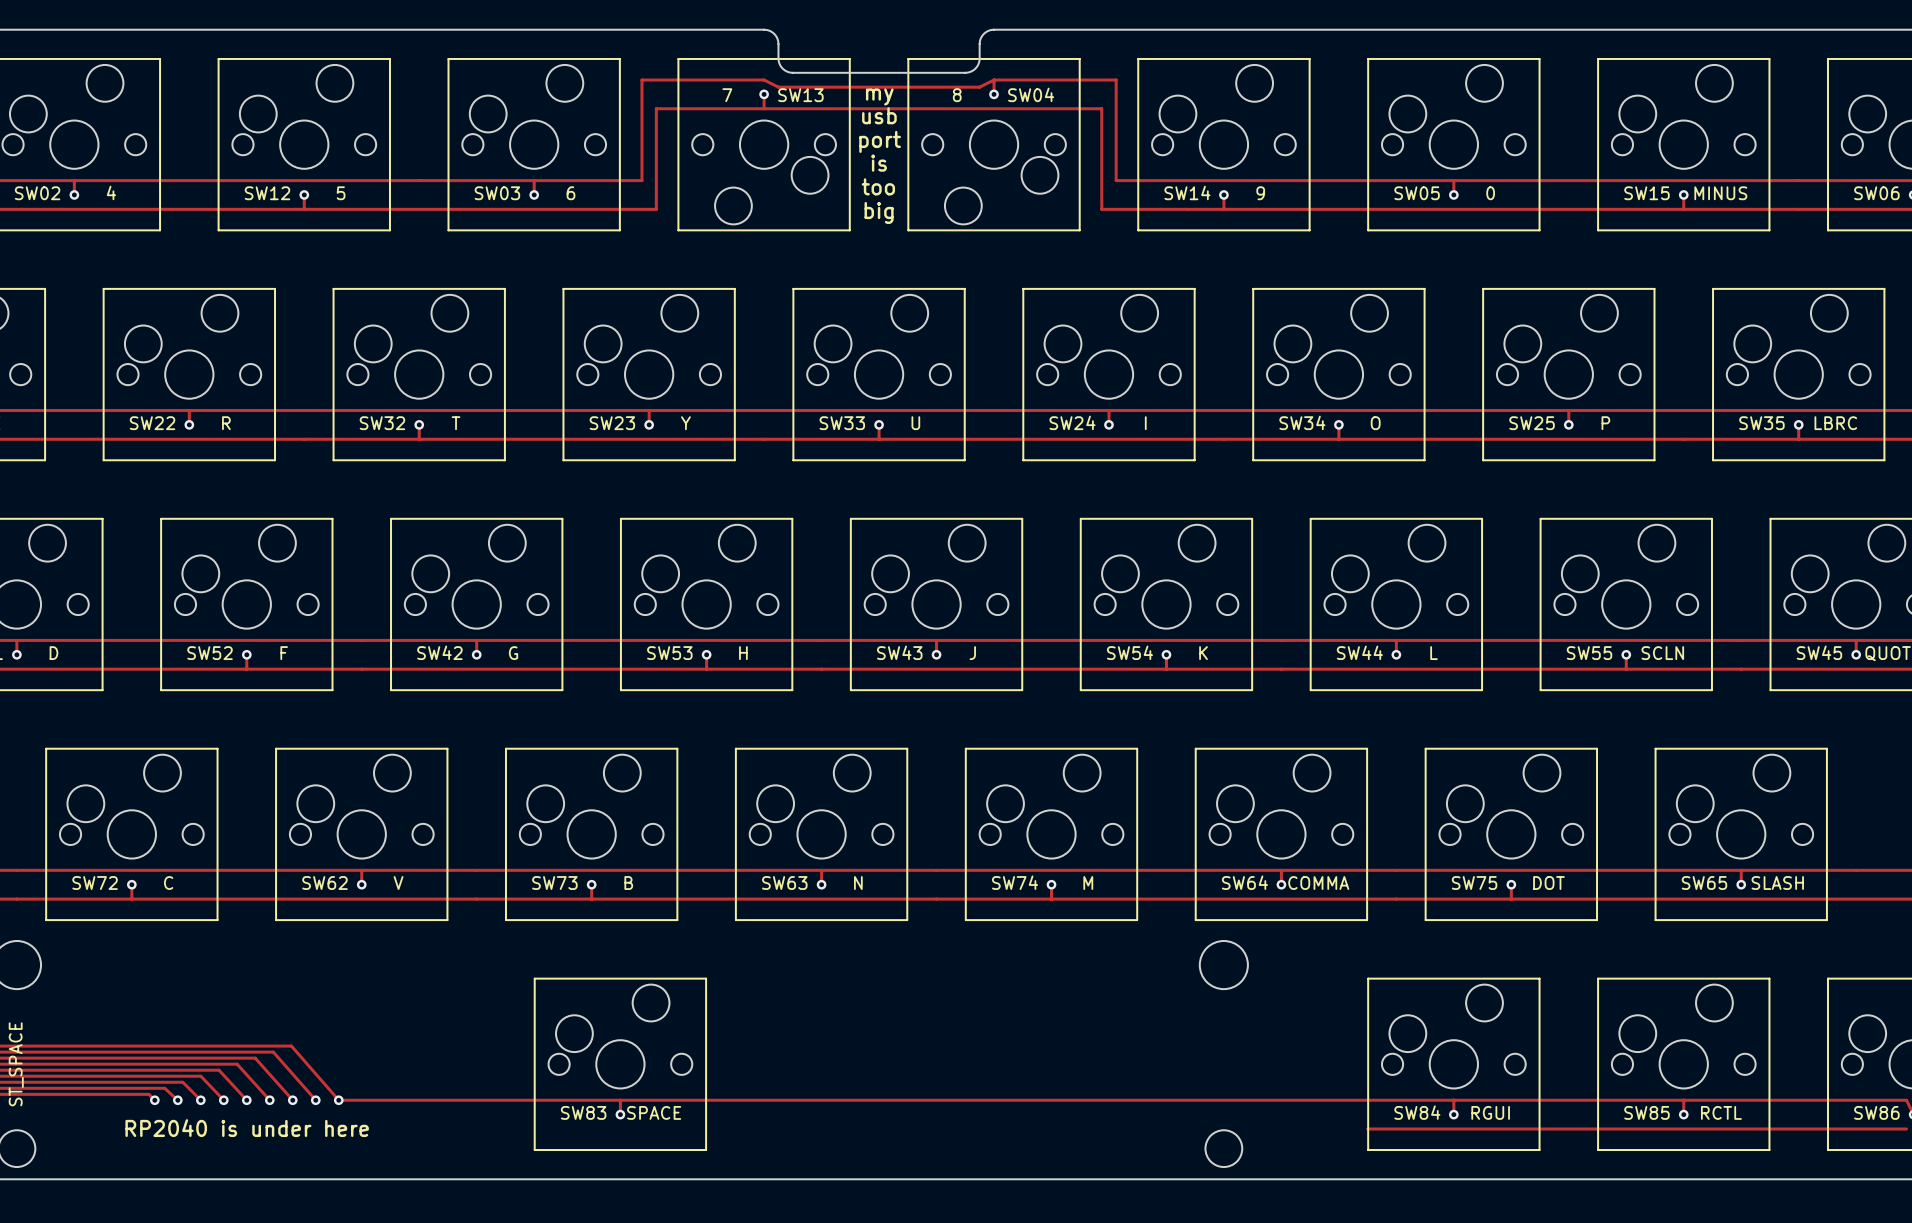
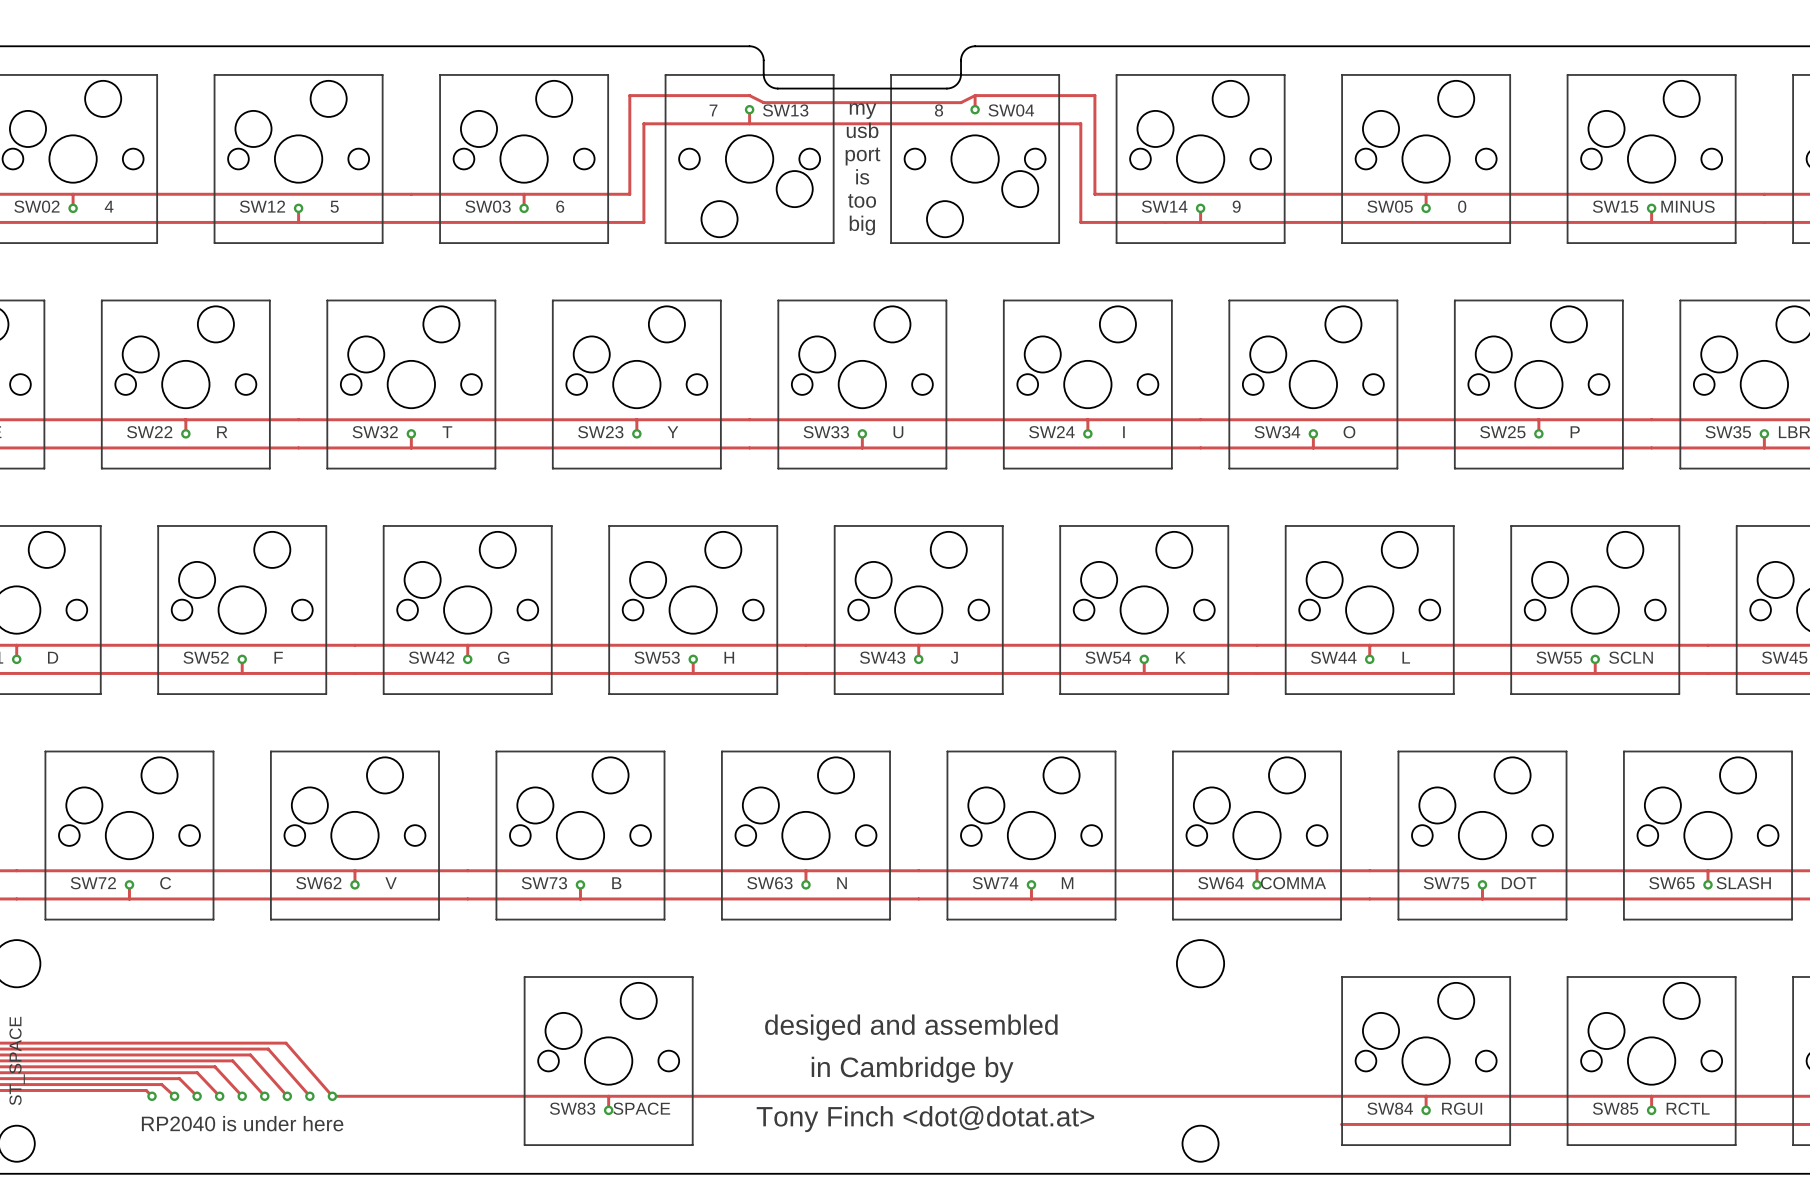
text: none -> desiged and assembled (911, 1027)
text: none -> in Cambridge by (912, 1069)
text: none -> Tony Finch <dot@dotat.at> (925, 1119)

